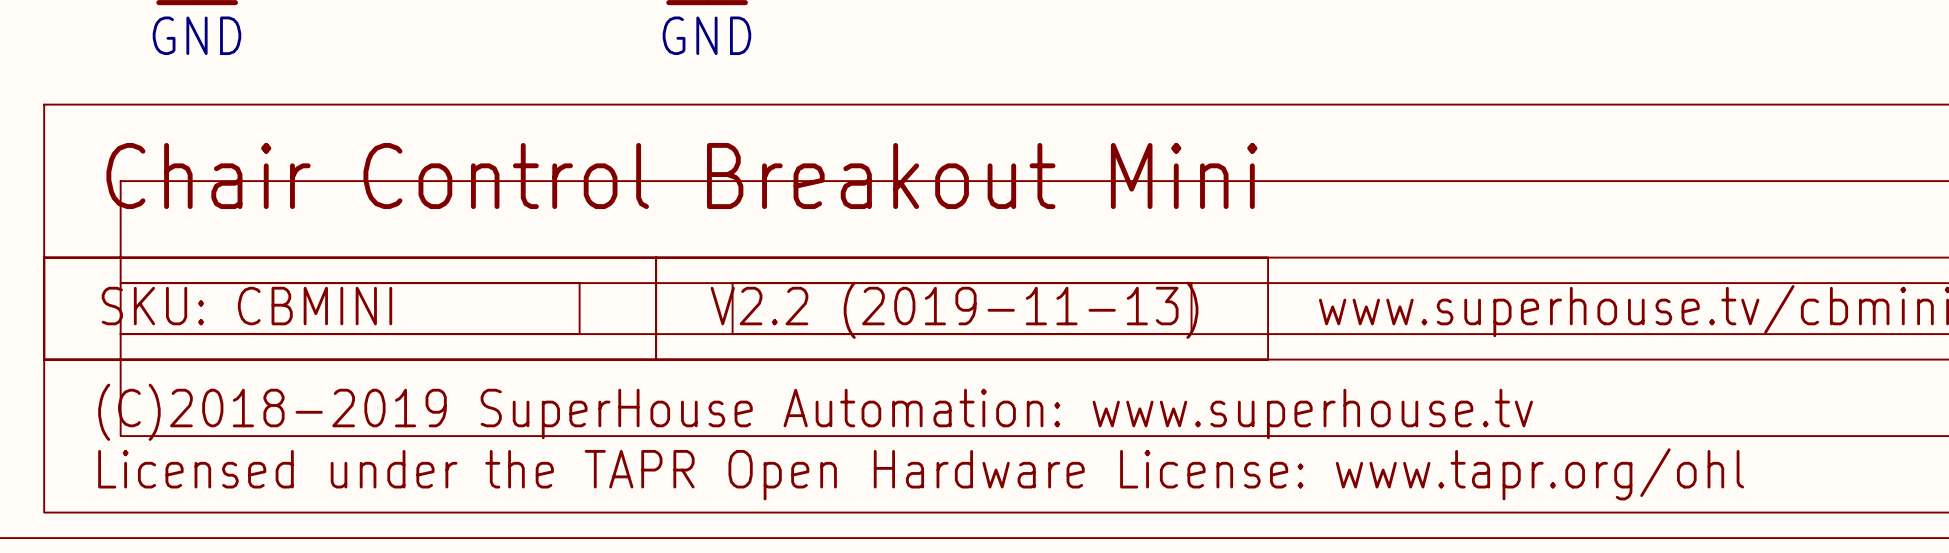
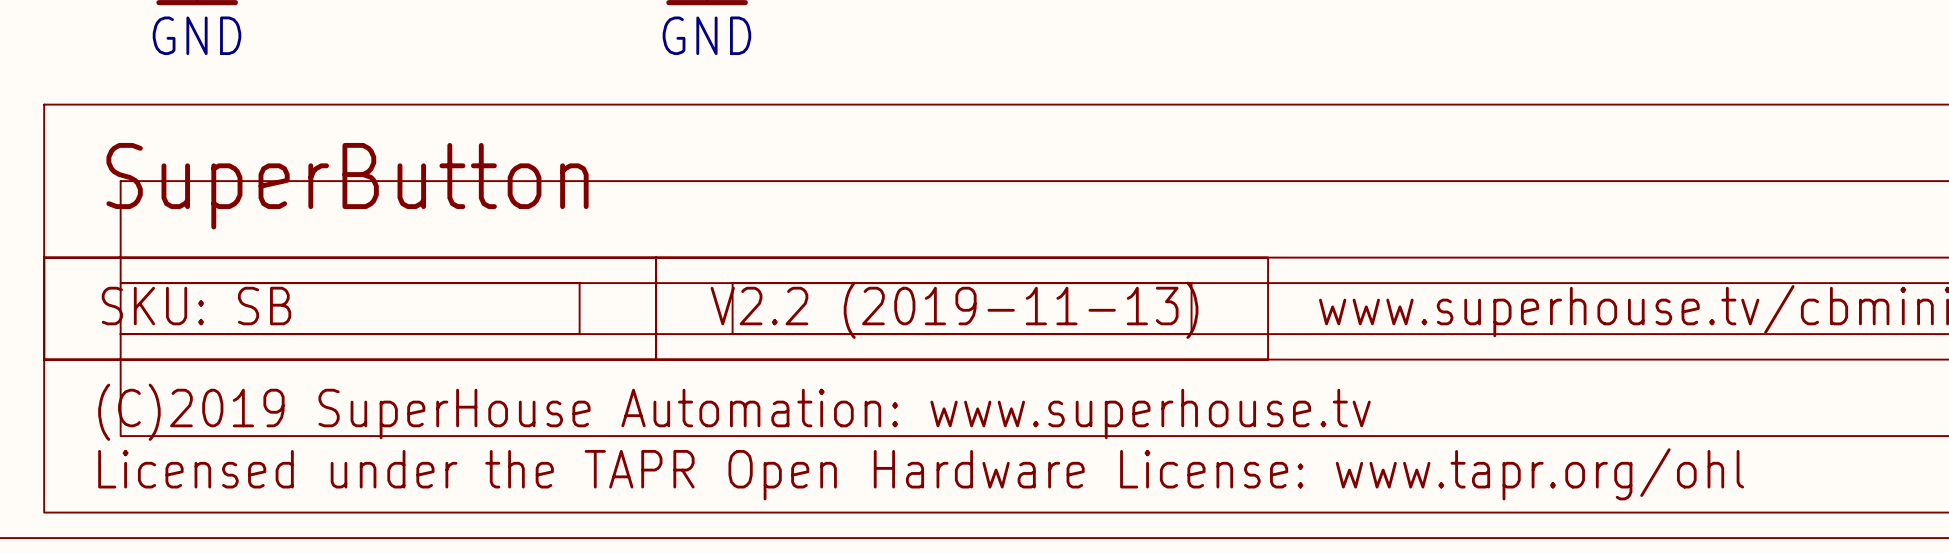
text: Chair Control Breakout Mini (681, 176) -> SuperButton (347, 186)
text: SKU: CBMINI (246, 306) -> SKU: SB (196, 306)
text: (C)2018-2019 SuperHouse Automation: www.superhouse.tv (815, 412) -> (C)2019 SuperHouse Automation: www.superhouse.tv (734, 412)

